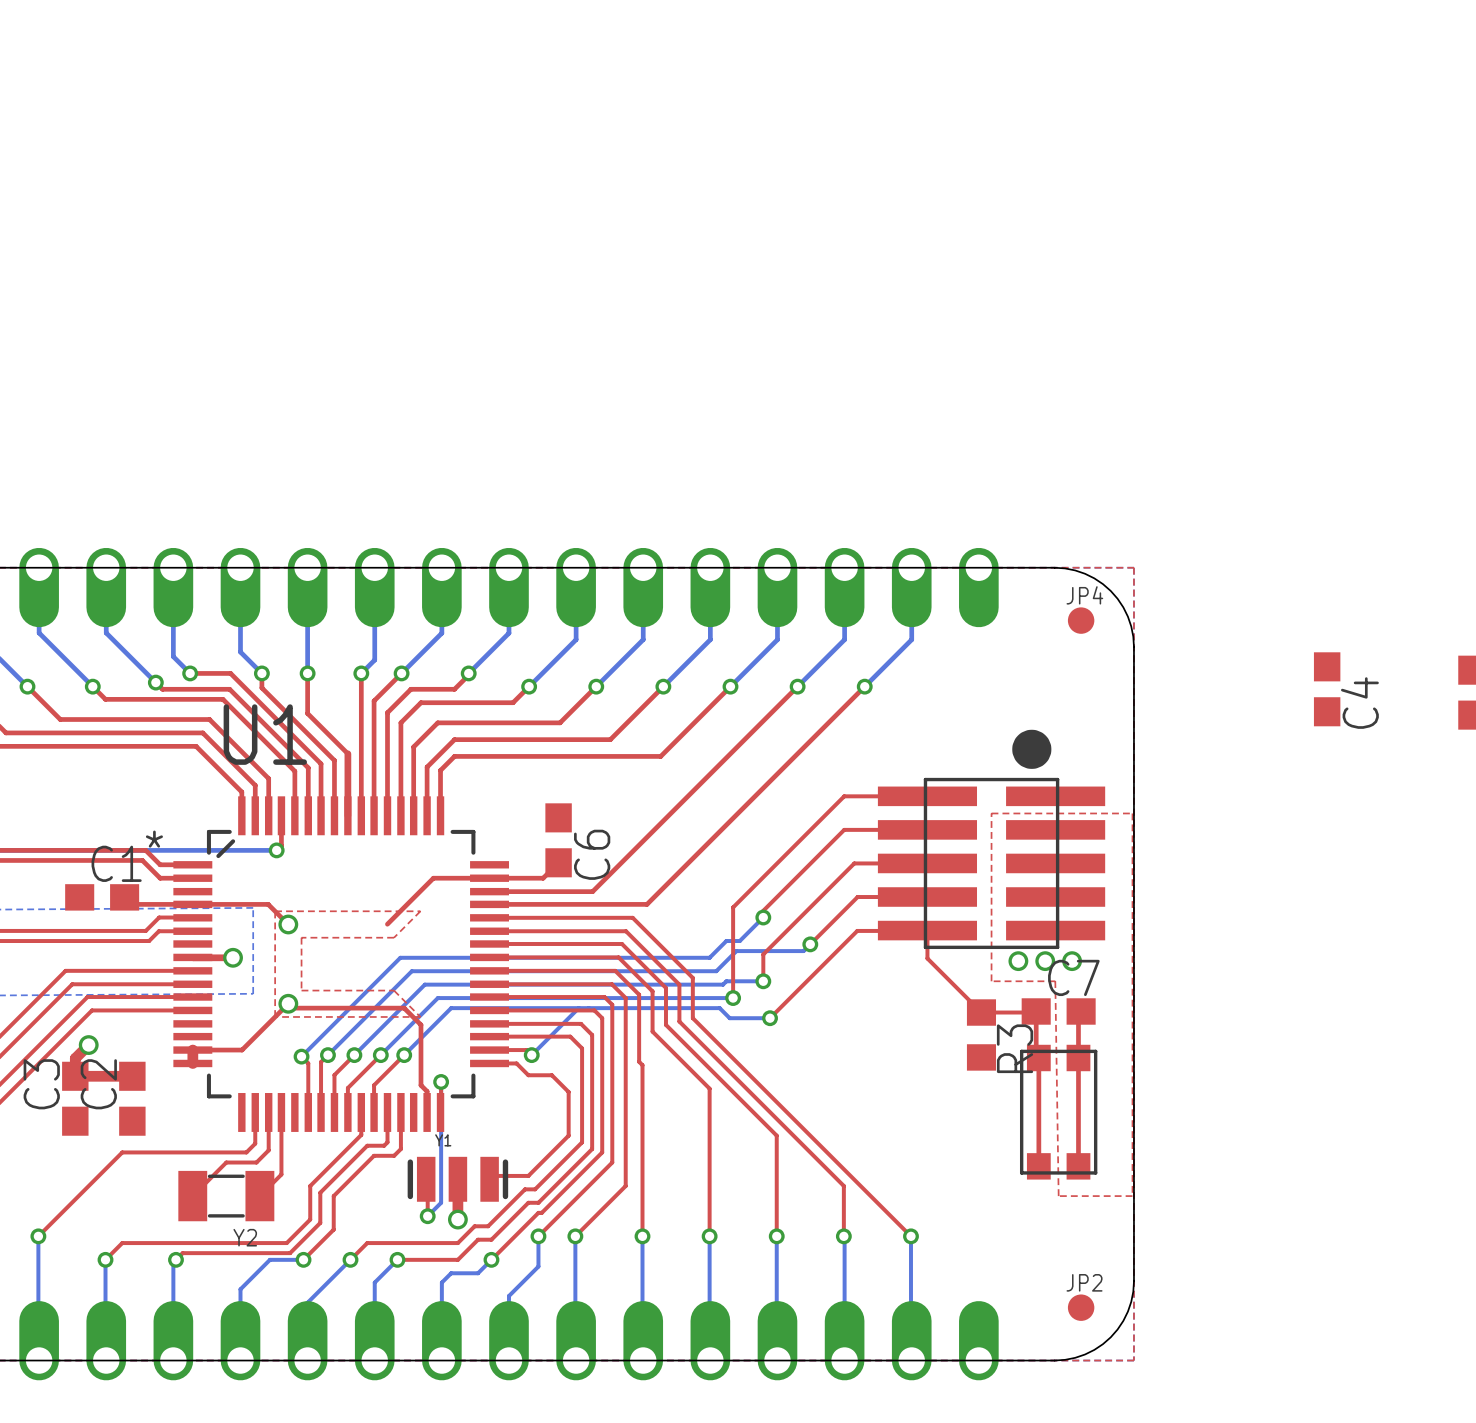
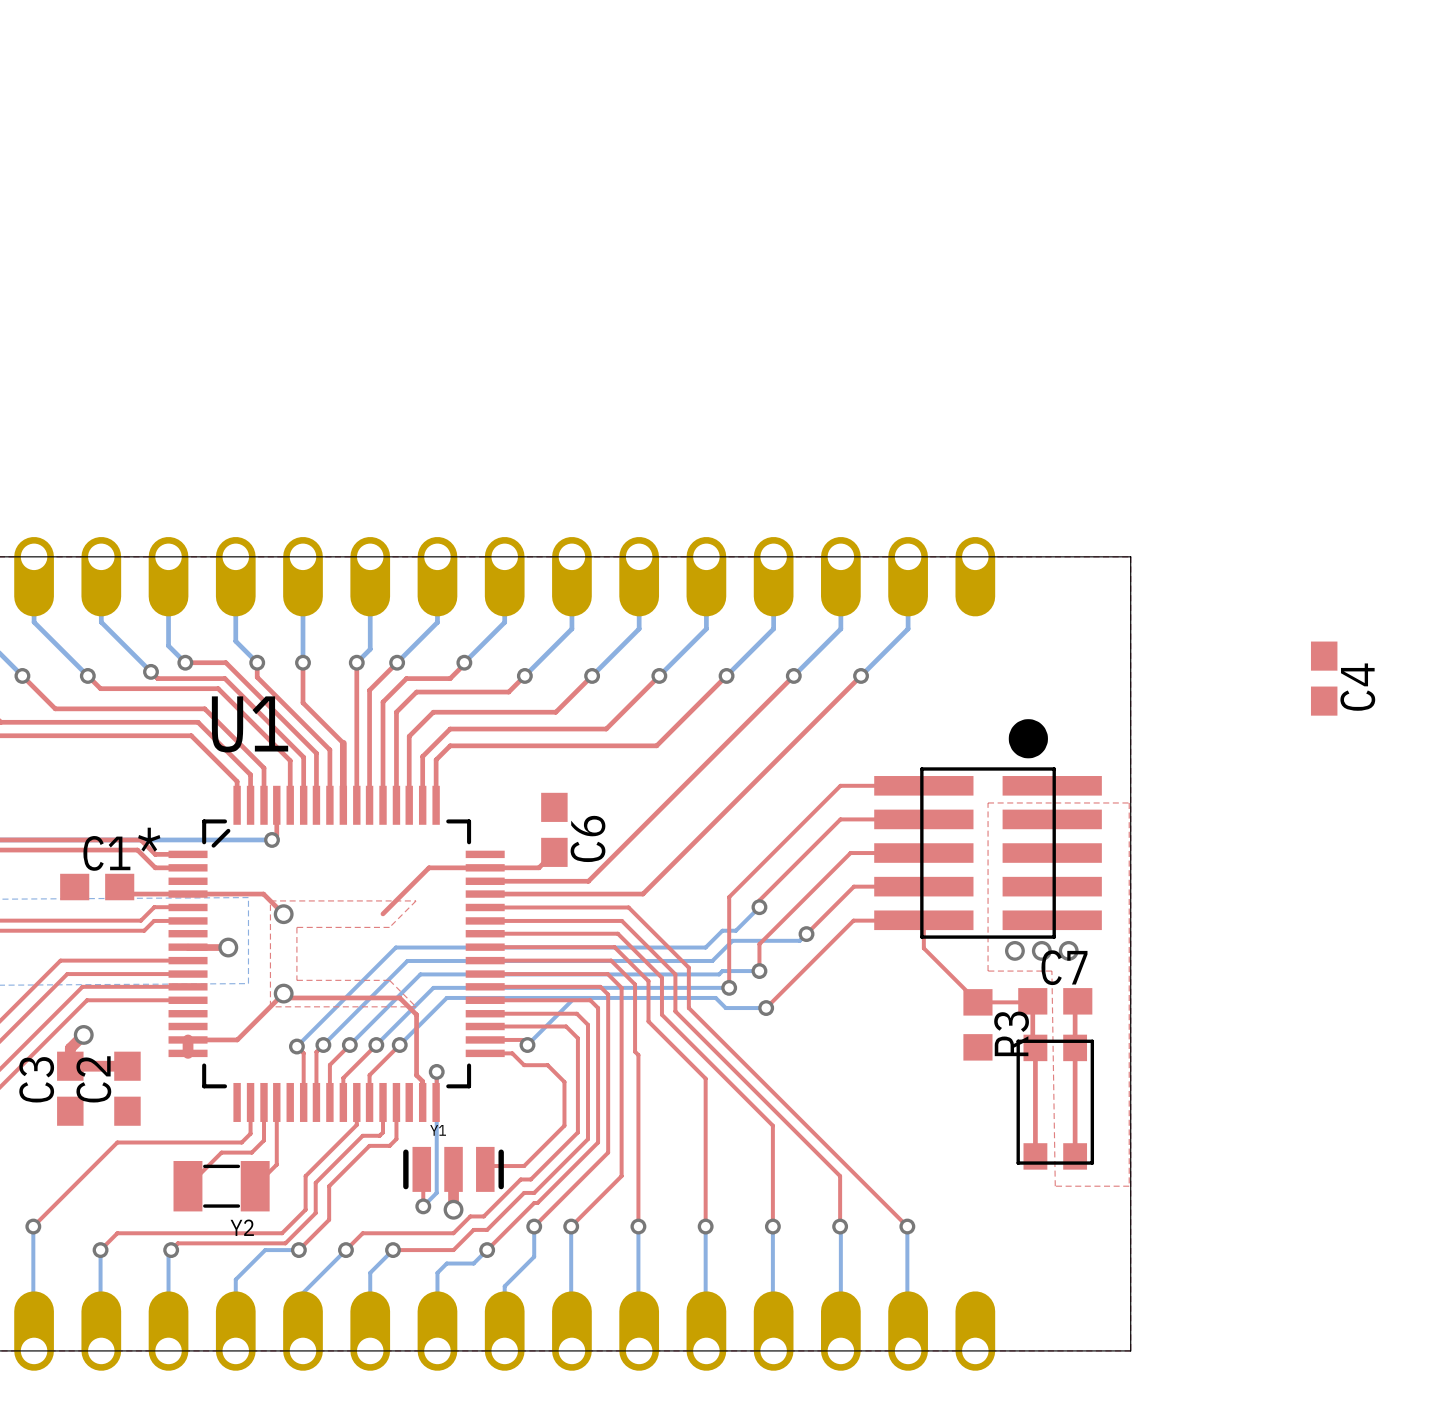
board edge: (1054, 567) (1085, 573) (1110, 590) (1127, 616) (1133, 647) -> (1051, 556) (1130, 556) (1130, 636)
JP4: (1081, 620) -> none
board edge: (1133, 1281) (1127, 1311) (1110, 1337) (1085, 1354) (1054, 1360) -> (1130, 1271) (1130, 1350) (1051, 1350)
JP2: (1081, 1307) -> none

